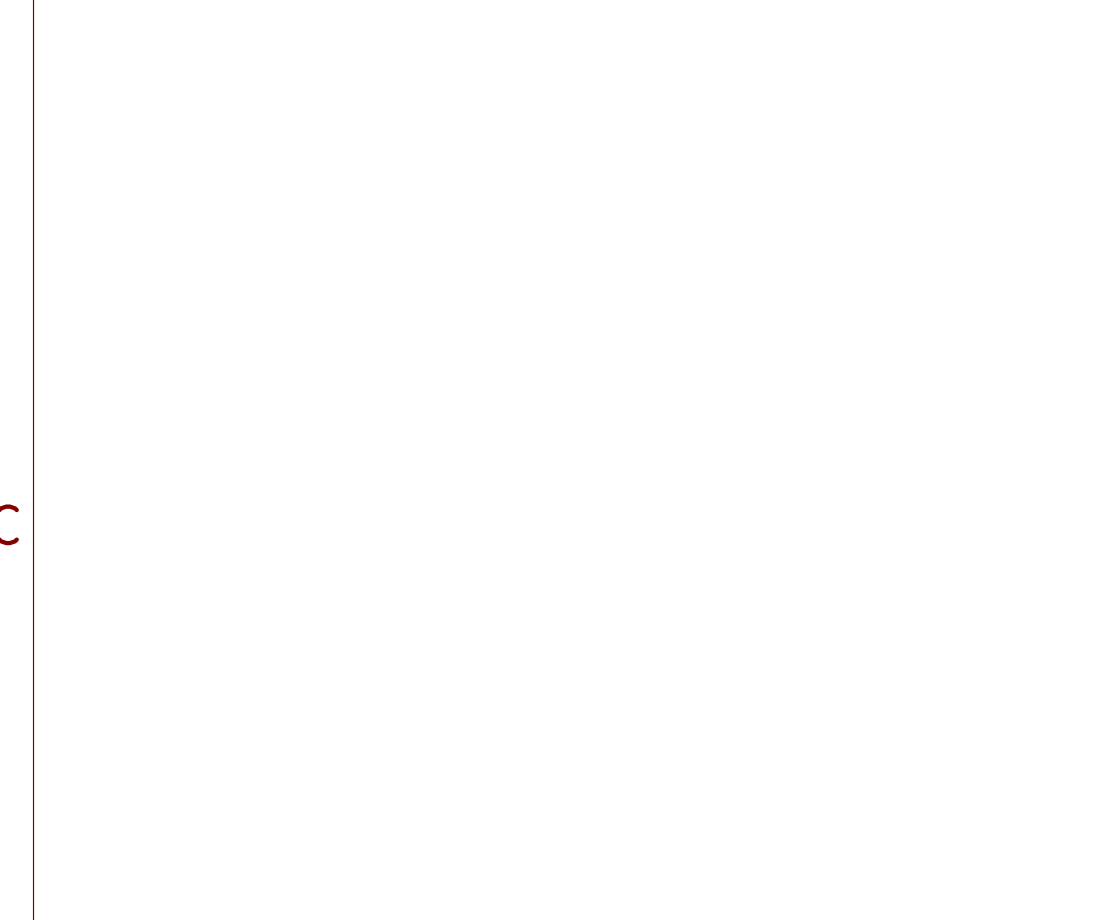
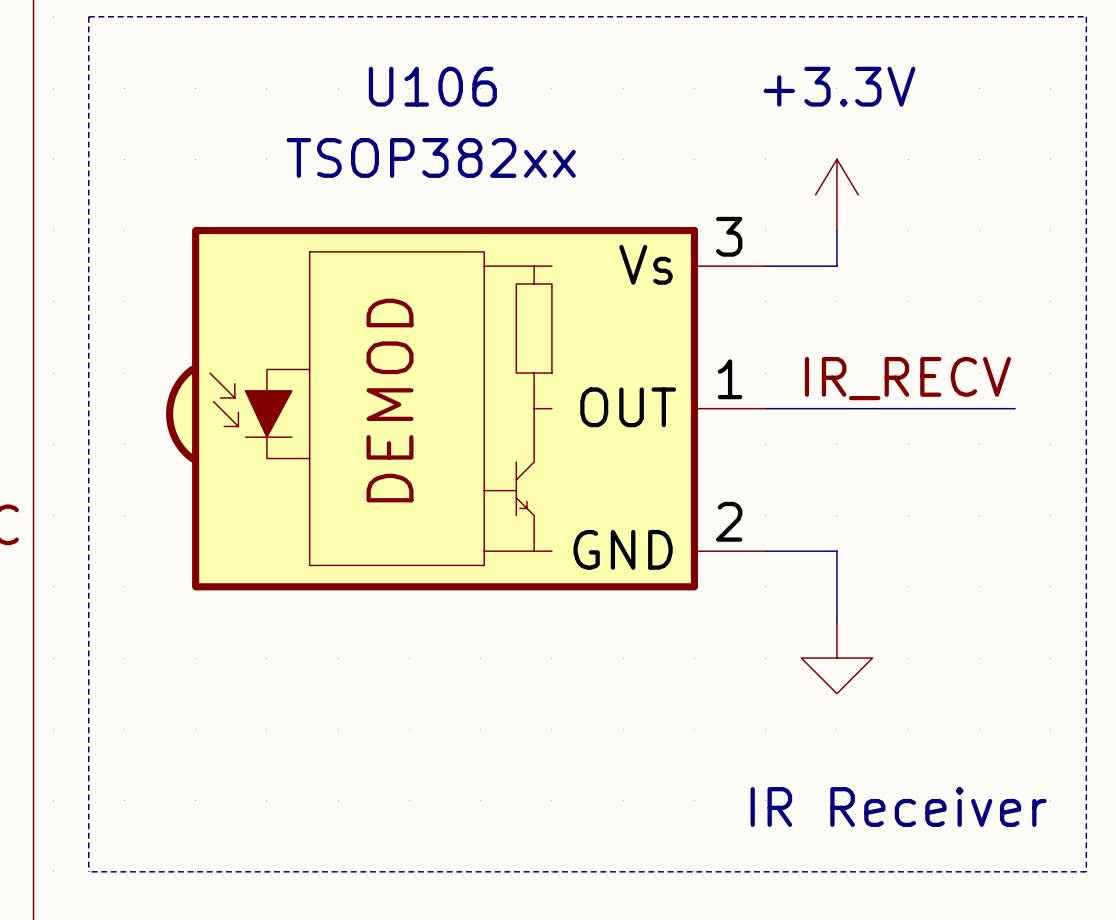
line: none -> (88, 16) (88, 871) (1086, 871) (1086, 16) (88, 16)
power symbol: none -> +3.3V (836, 194)
wire: none -> (836, 230) (836, 266) (765, 266)
label: none -> IR_RECV (907, 378)
U106: none -> TSOP382xx (465, 408)
wire: none -> (765, 408) (1015, 408)
wire: none -> (765, 551) (836, 551) (836, 622)
power symbol: none -> (836, 658)
text: none -> IR Receiver (898, 807)

